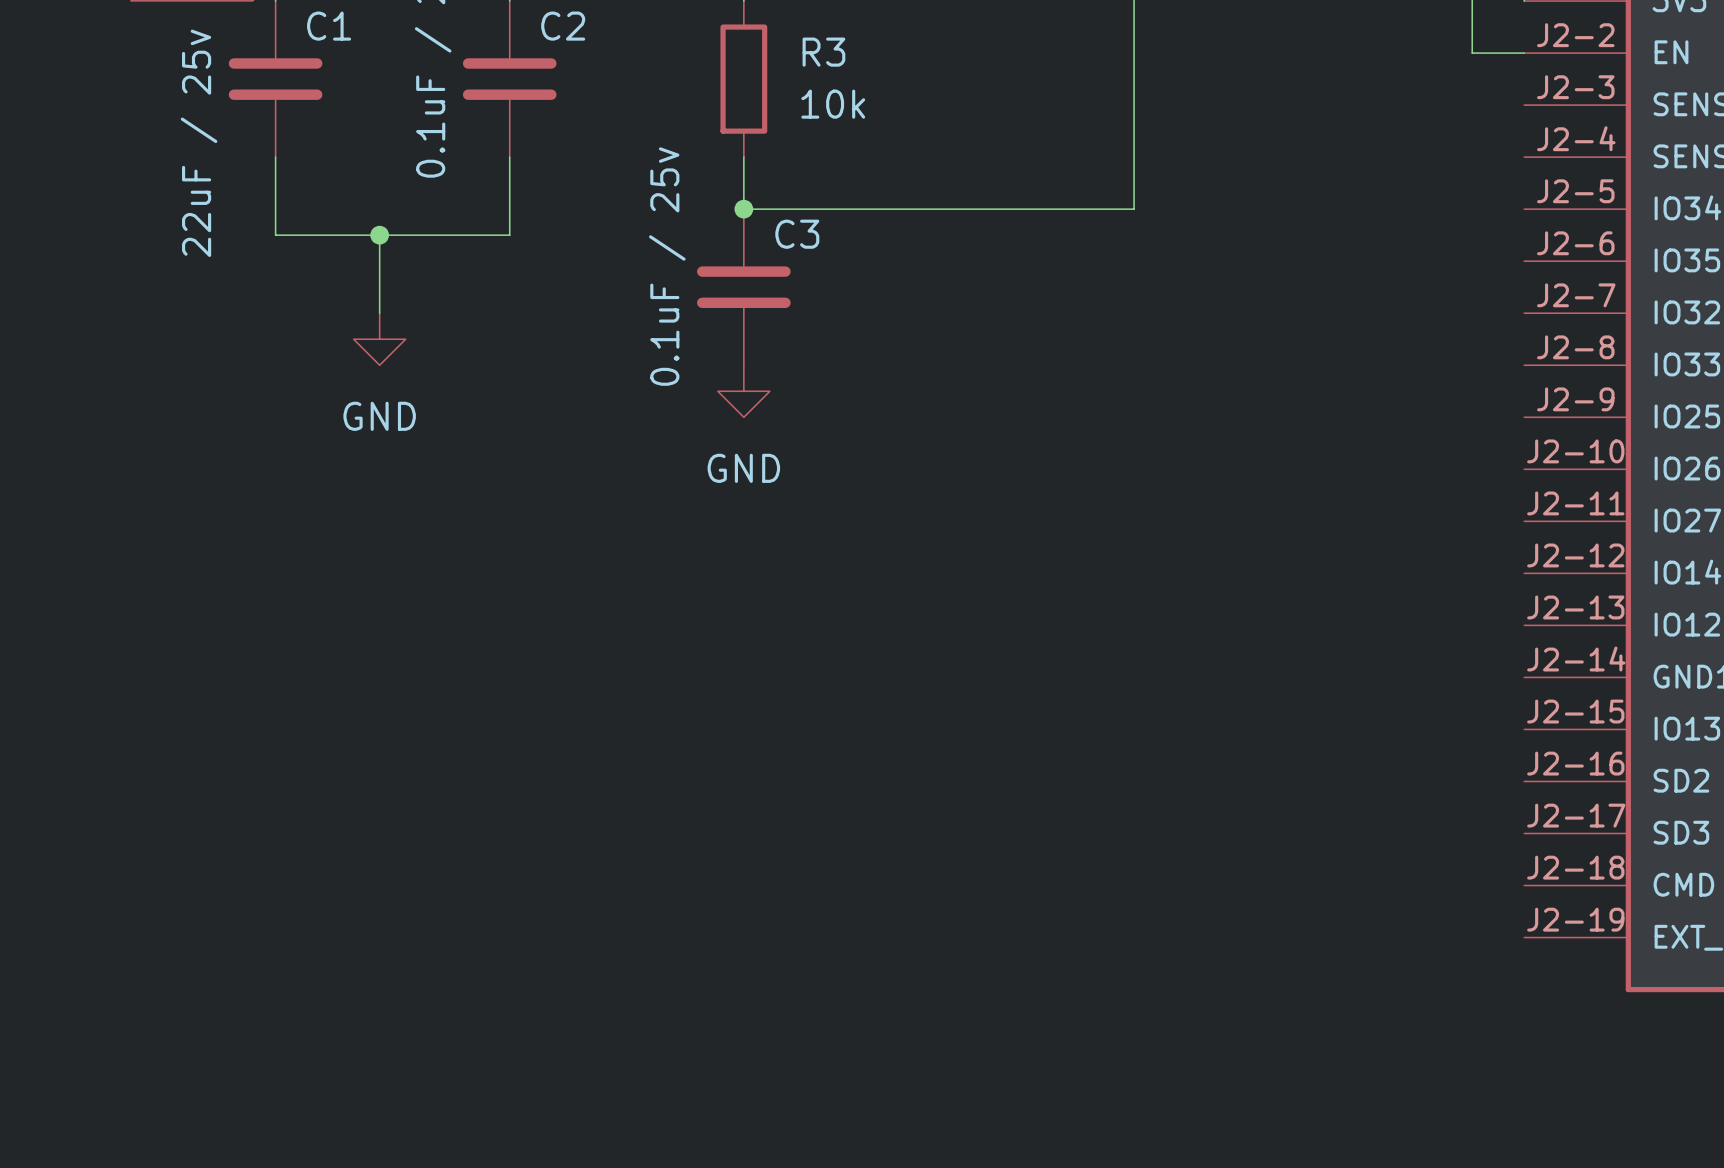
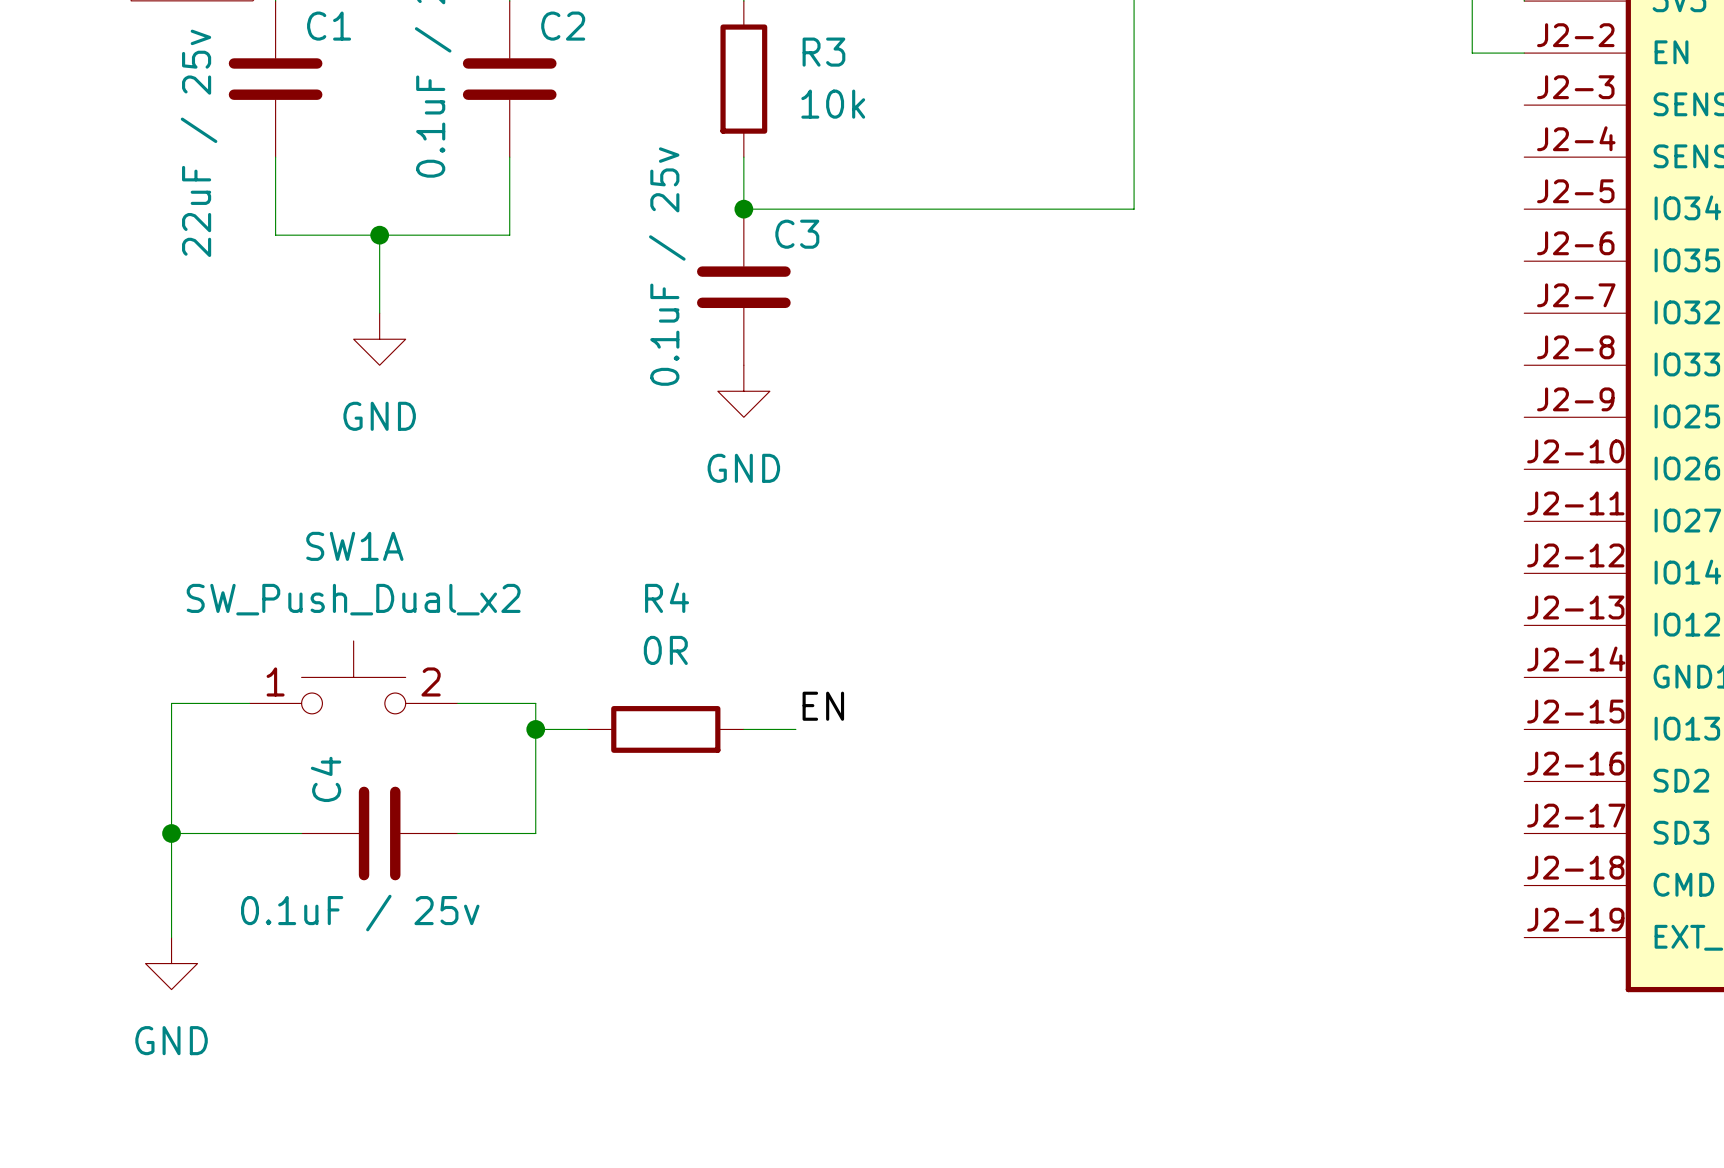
SW1A: none -> SW_Push_Dual_x2 (353, 677)
wire: none -> (249, 703) (171, 703) (171, 937)
wire: none -> (457, 703) (535, 703) (535, 833) (457, 833)
label: none -> EN (823, 706)
wire: none -> (535, 729) (587, 729)
junction: none -> (535, 729)
R4: none -> 0R (665, 729)
wire: none -> (743, 729) (795, 729)
wire: none -> (171, 833) (301, 833)
junction: none -> (171, 833)
C4: none -> 0.1uF / 25v (379, 833)
power symbol: none -> GND (171, 963)

